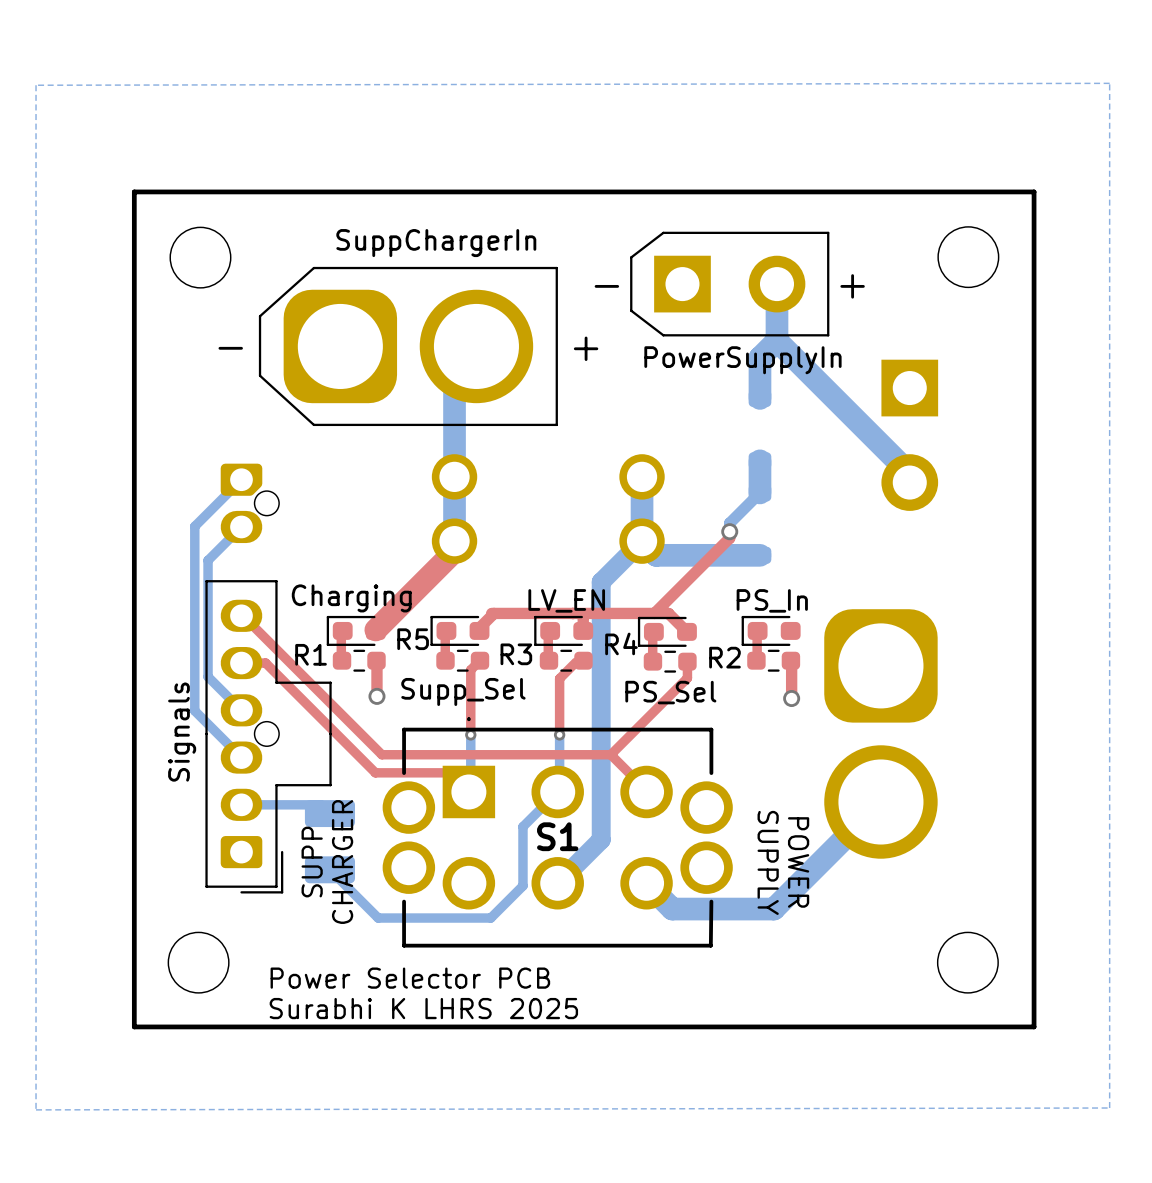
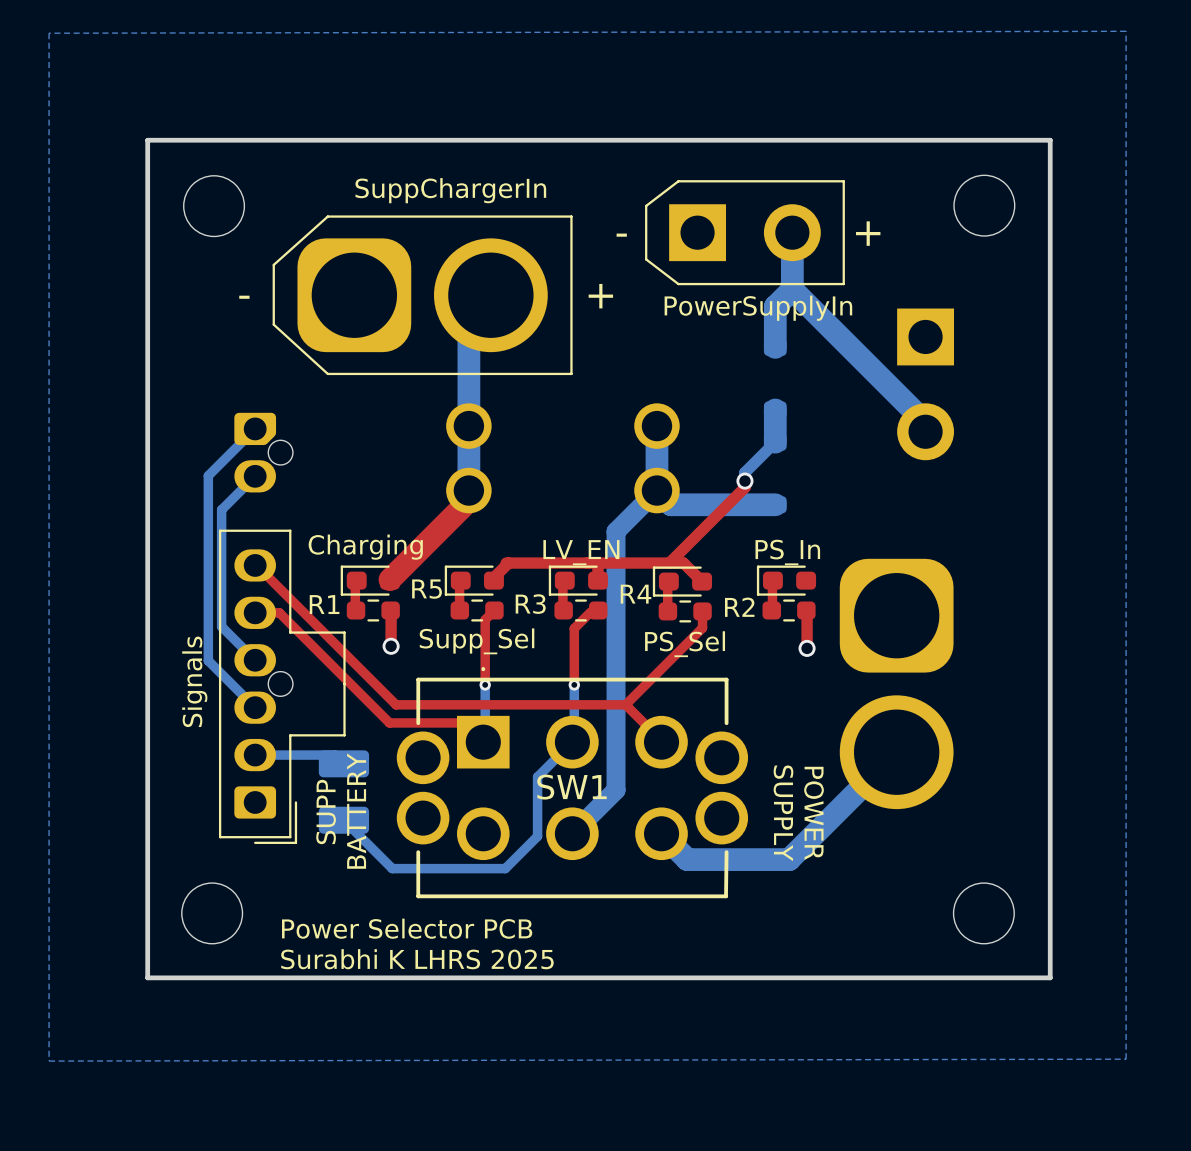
S1 name: S1 (557, 836) -> SW1 (571, 787)
text: CHARGER (342, 862) -> BATTERY (356, 811)

